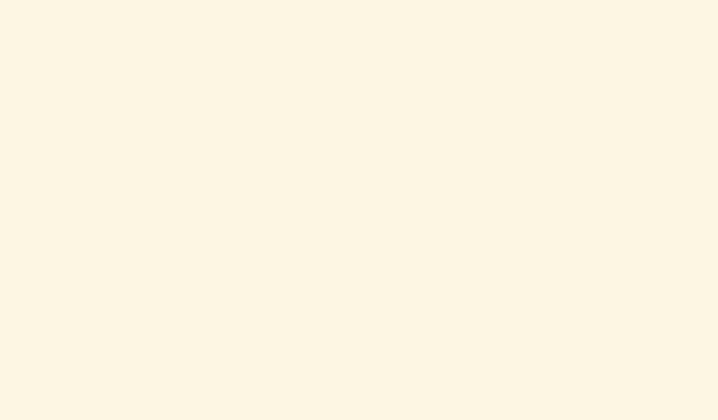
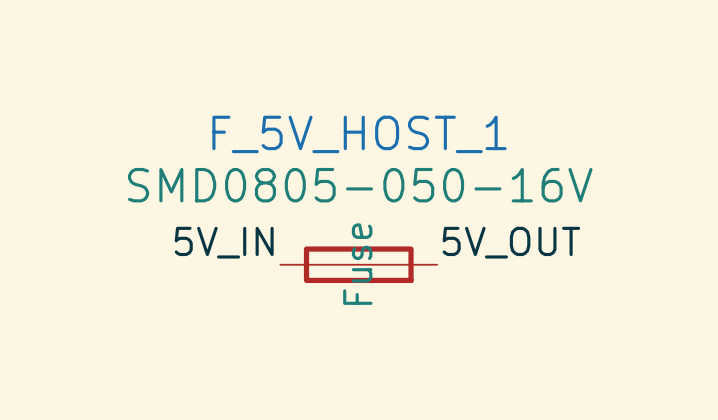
label: none -> 5V_IN (224, 242)
label: none -> 5V_OUT (511, 242)
F_5V_HOST_1: none -> SMD0805-050-16V (358, 264)

